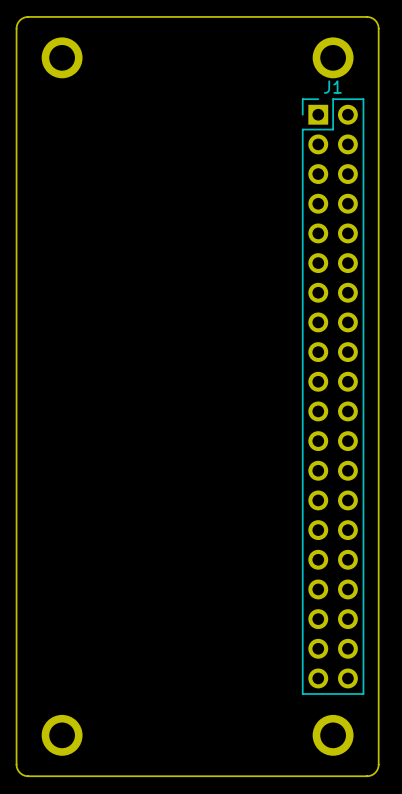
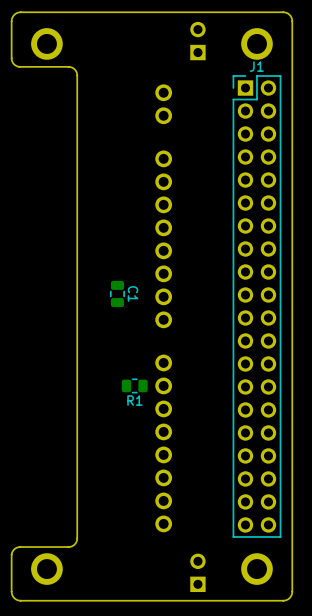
part: none -> (197, 41)
board edge: (16, 76) (16, 716) -> (11, 58) (13, 64) (18, 66) (69, 66) (74, 69) (77, 75) (77, 539) (74, 544) (69, 546) (18, 547) (13, 549) (11, 554)
part: none -> (163, 104)
part: none -> (163, 239)
C1: none -> (117, 293)
R1: none -> (134, 385)
part: none -> (163, 443)
part: none -> (197, 572)

